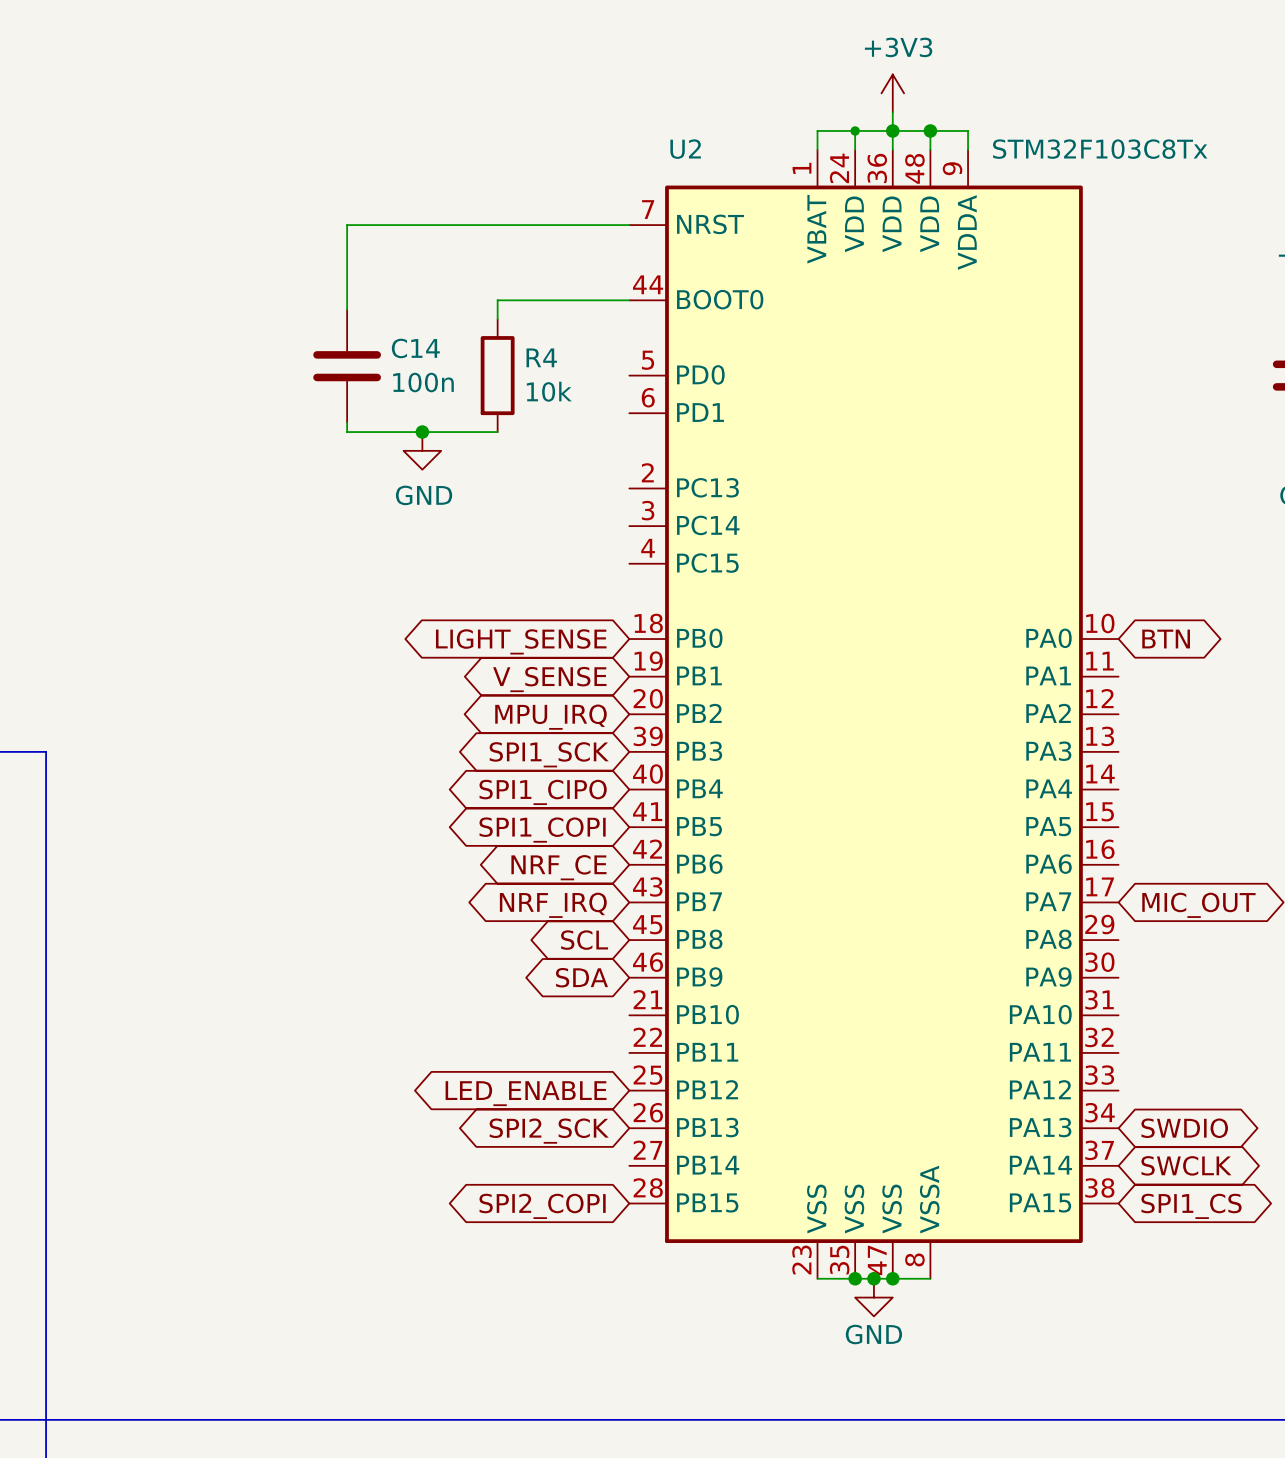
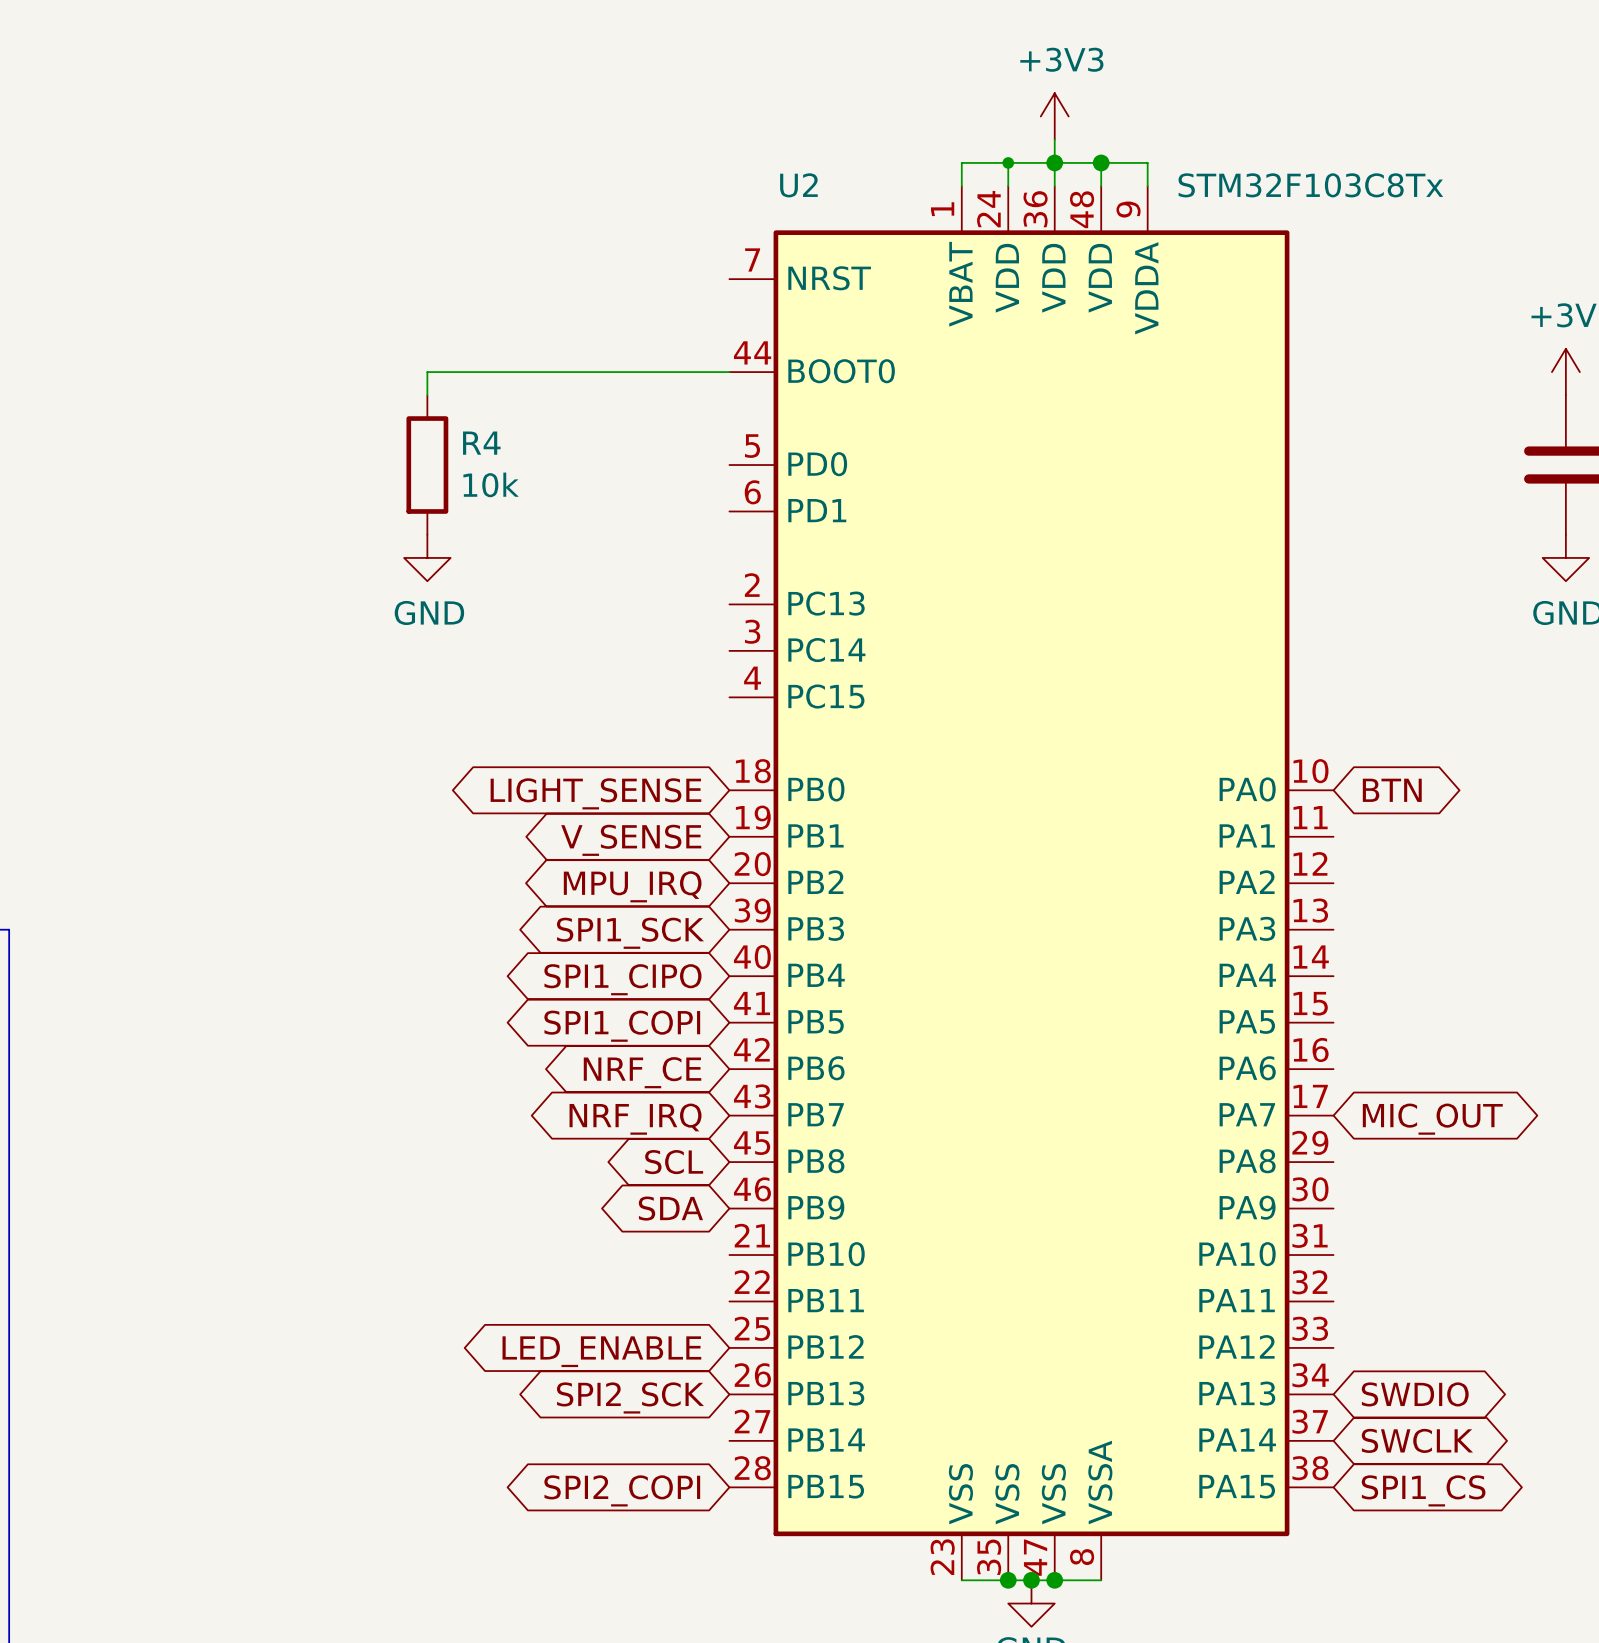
wire: (629, 225) (347, 225) (347, 309) -> none
wire: (497, 300) (497, 319) -> (566, 372) (427, 372) (427, 395)
C14: 100n (347, 366) -> none
R4 position: (497, 375) -> (427, 465)
wire: (347, 422) (347, 432) (497, 432) -> none
junction: (422, 432) -> none
power symbol position: GND (422, 450) -> GND (427, 557)

